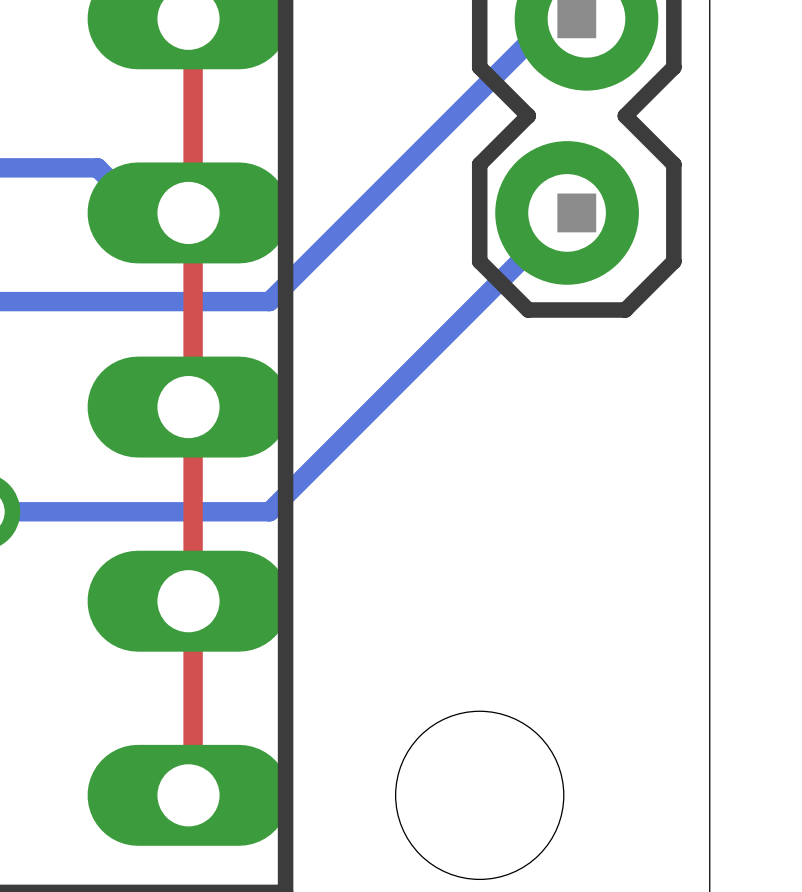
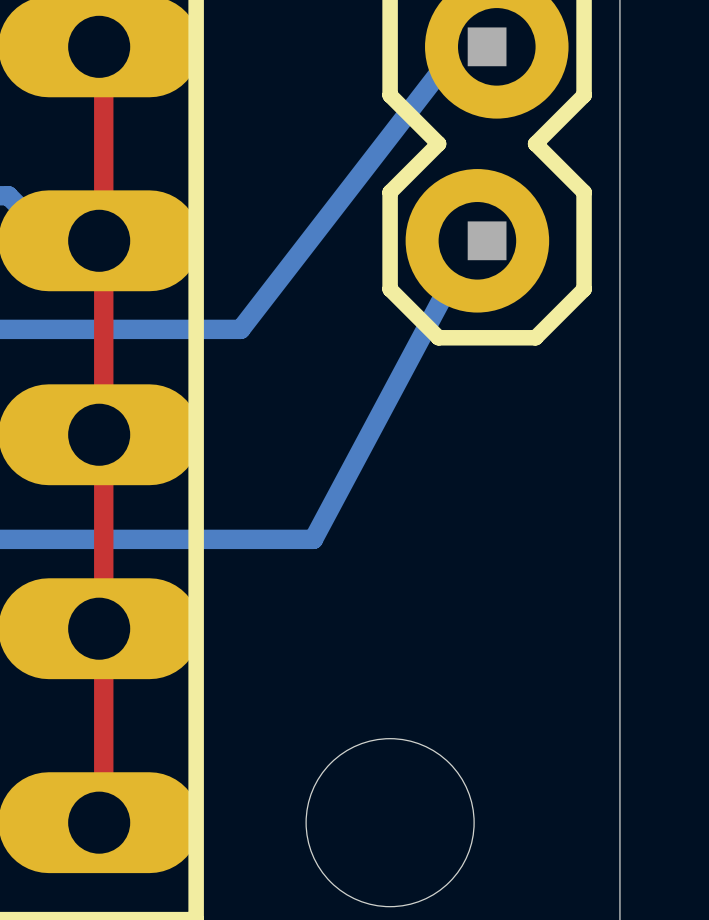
bottom track: (537, 34) (269, 301) -> (447, 62) (240, 329) (180, 329)
bottom track: (556, 225) (269, 511) -> (466, 253) (313, 539) (180, 539)

